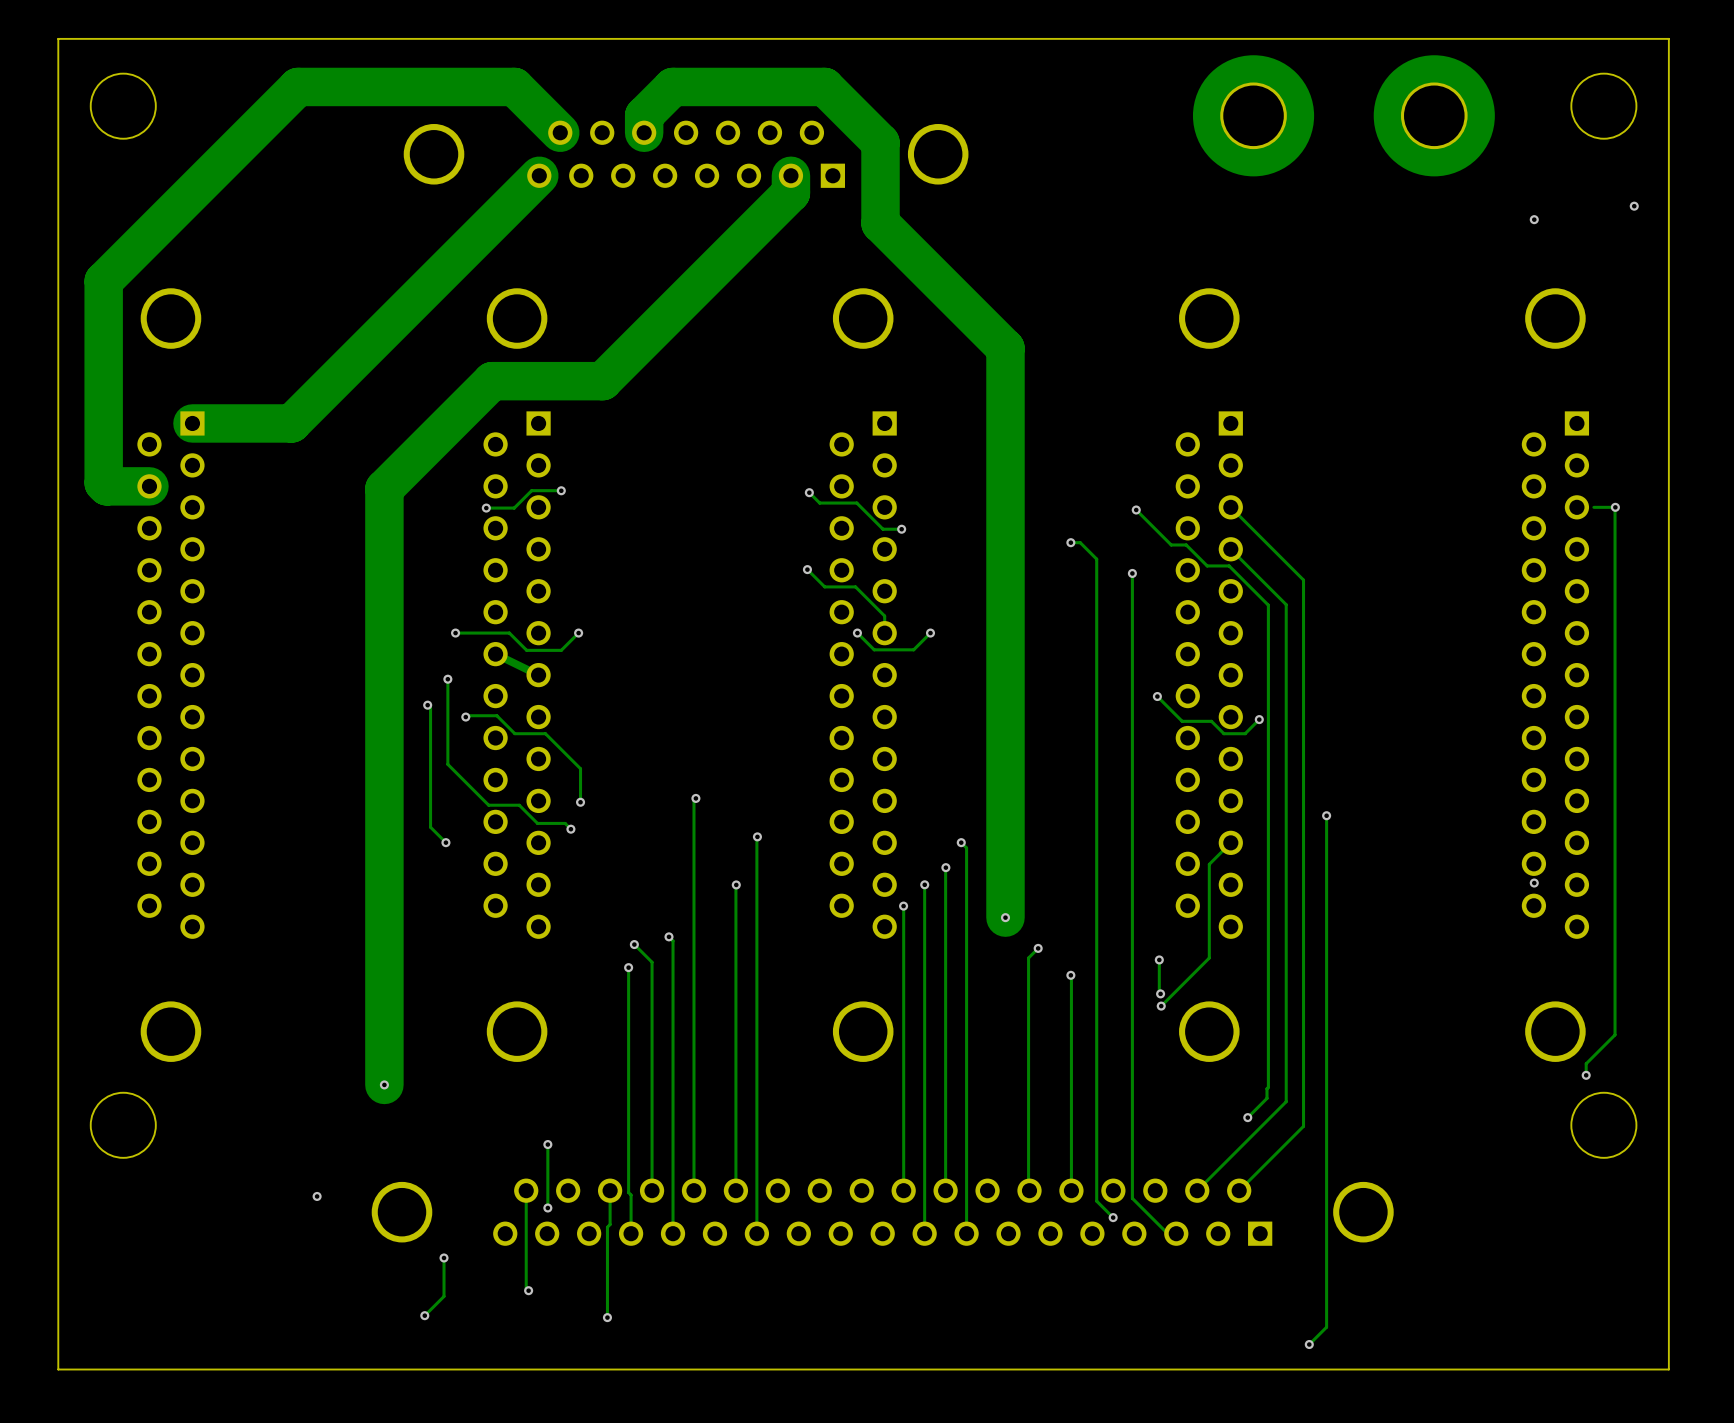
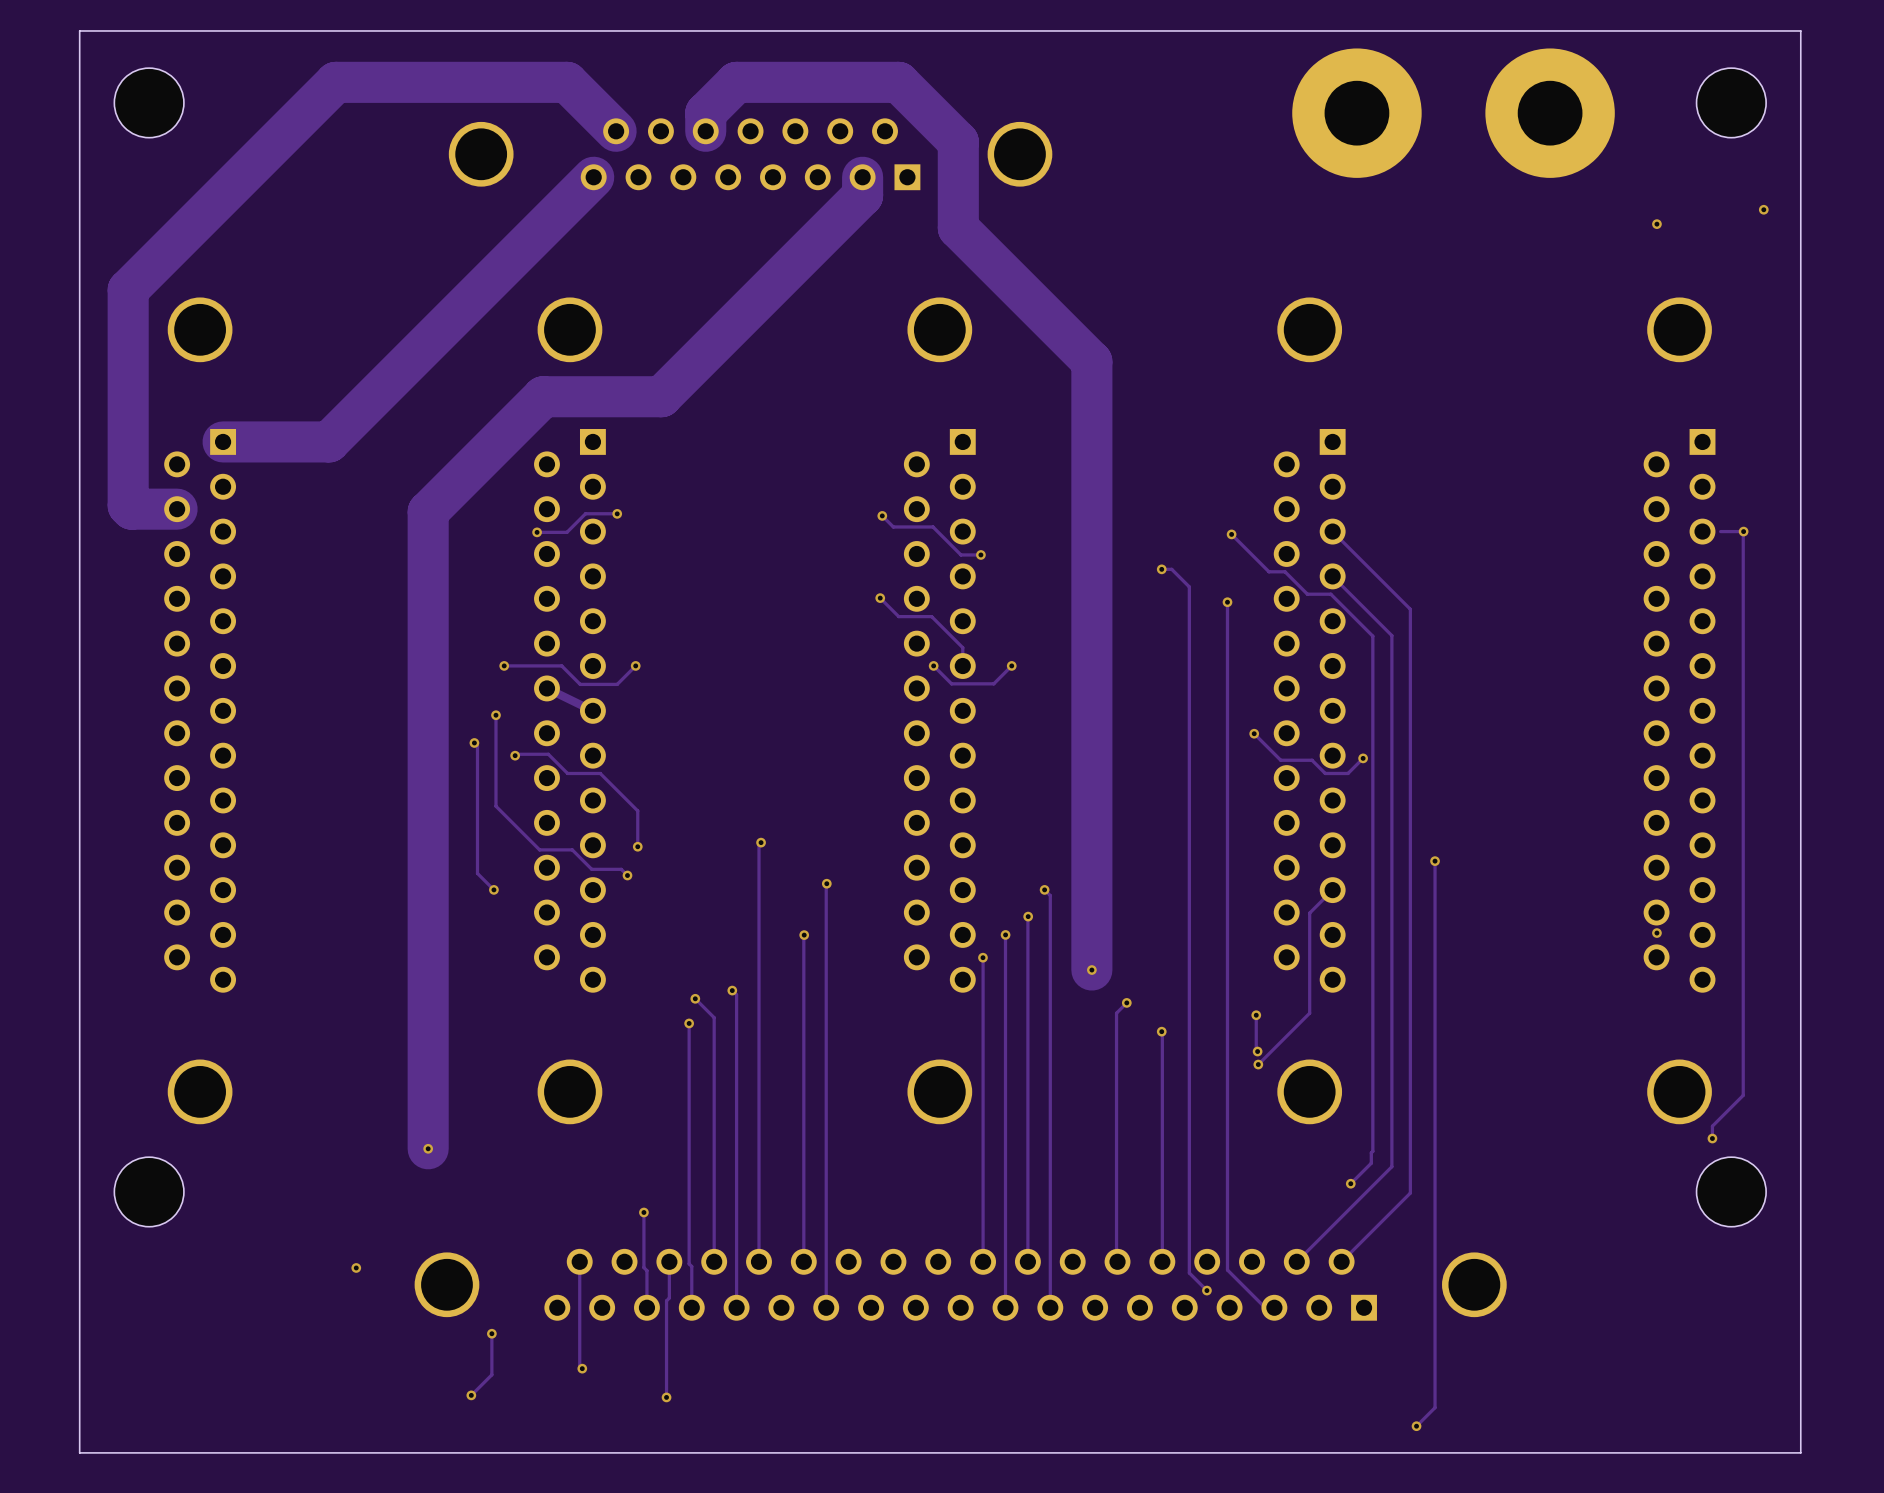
track: (547, 1144) (547, 1207) -> none
via: (547, 1144) -> none
track: none -> (643, 1212) (643, 1267) (646, 1270) (646, 1307)
via: none -> (643, 1212)
via: (547, 1207) -> none

